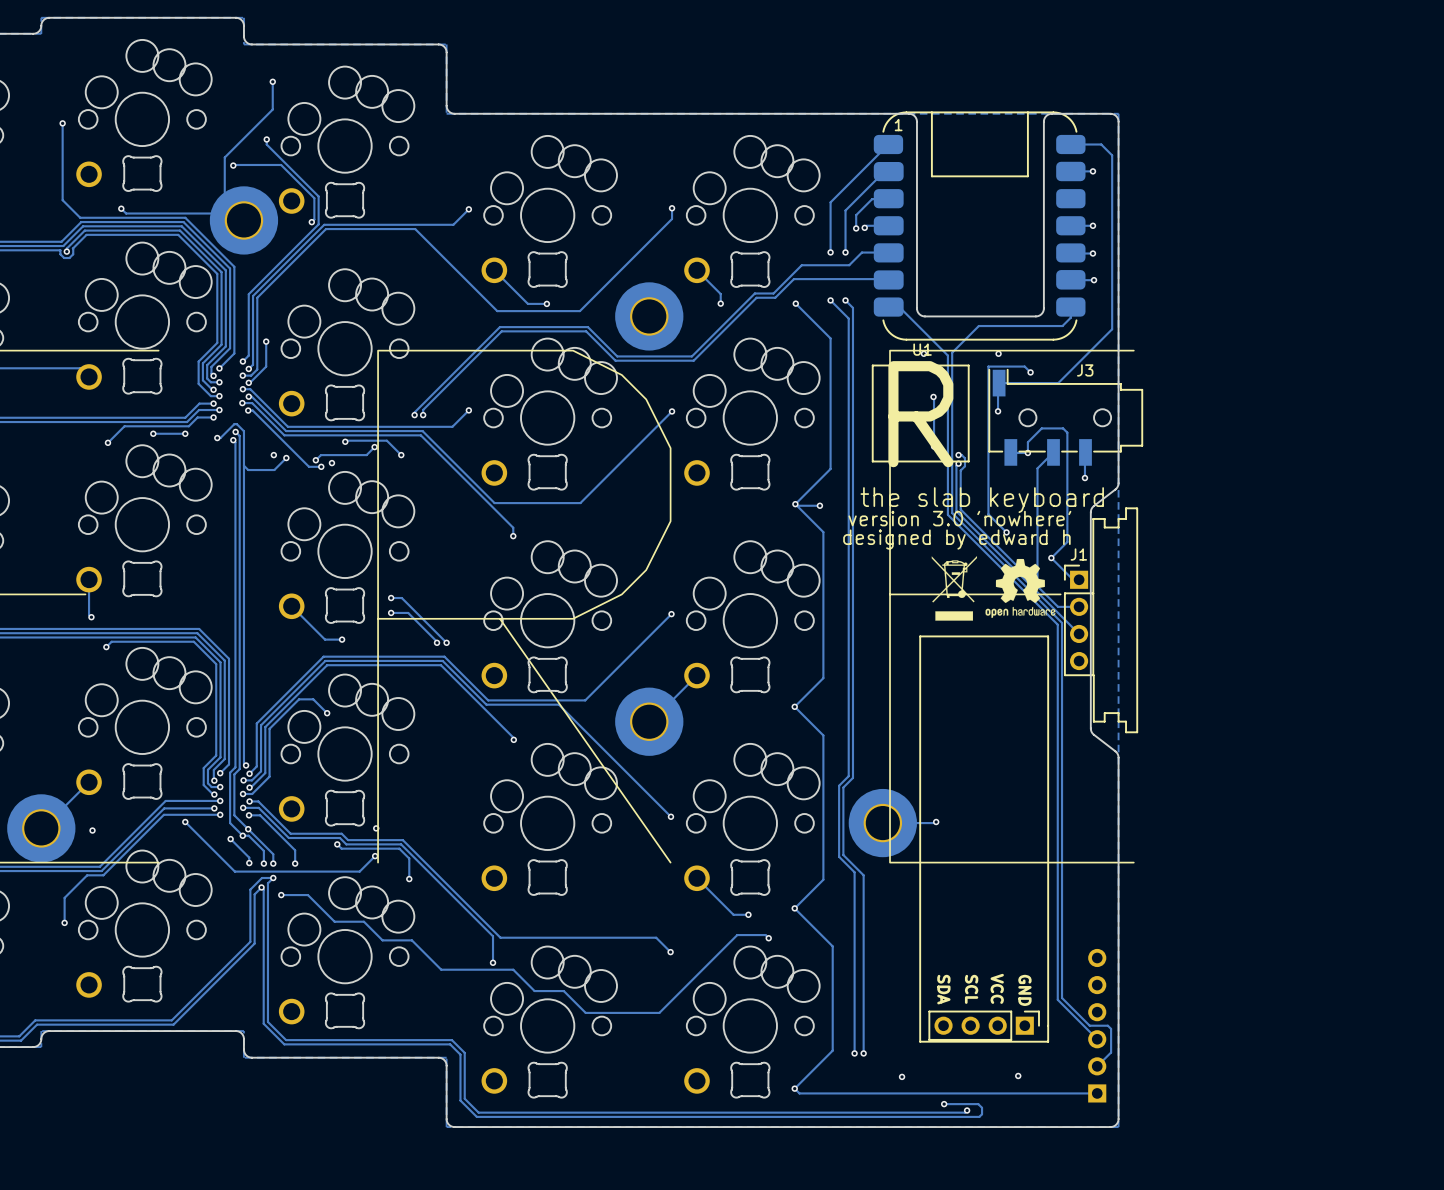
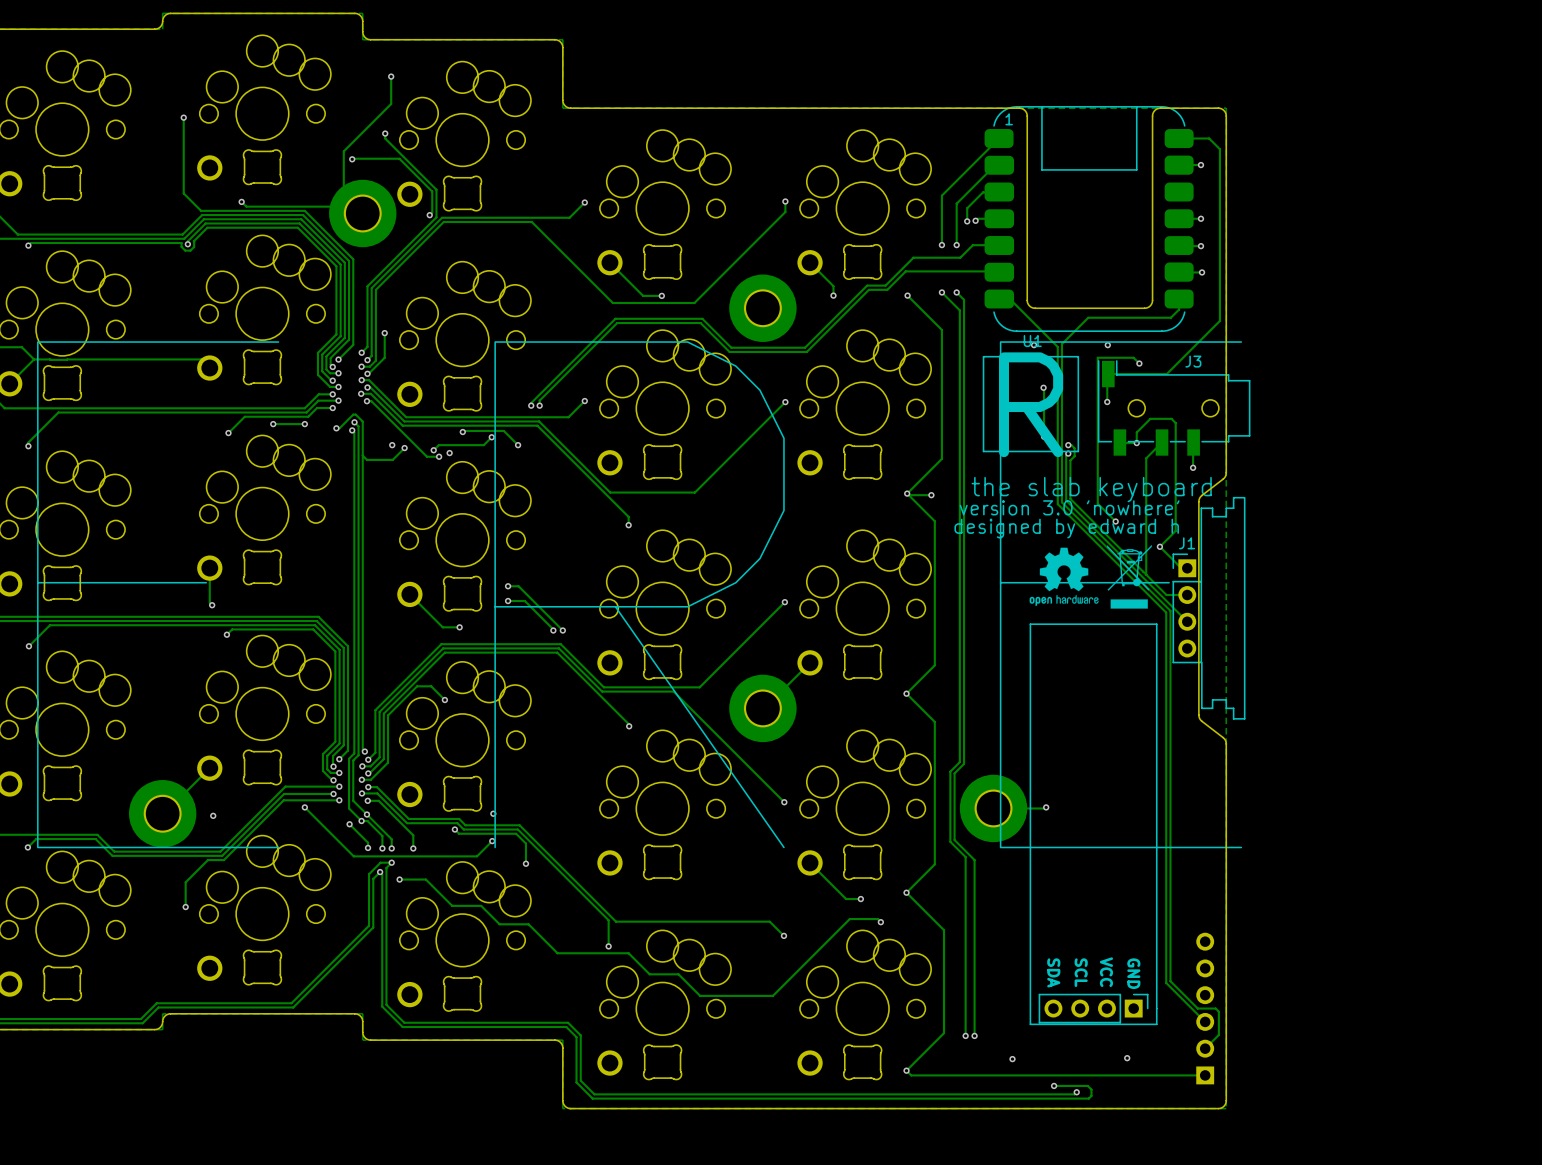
drawing position: (954, 588) -> (1129, 576)
drawing position: (1020, 588) -> (1064, 576)

